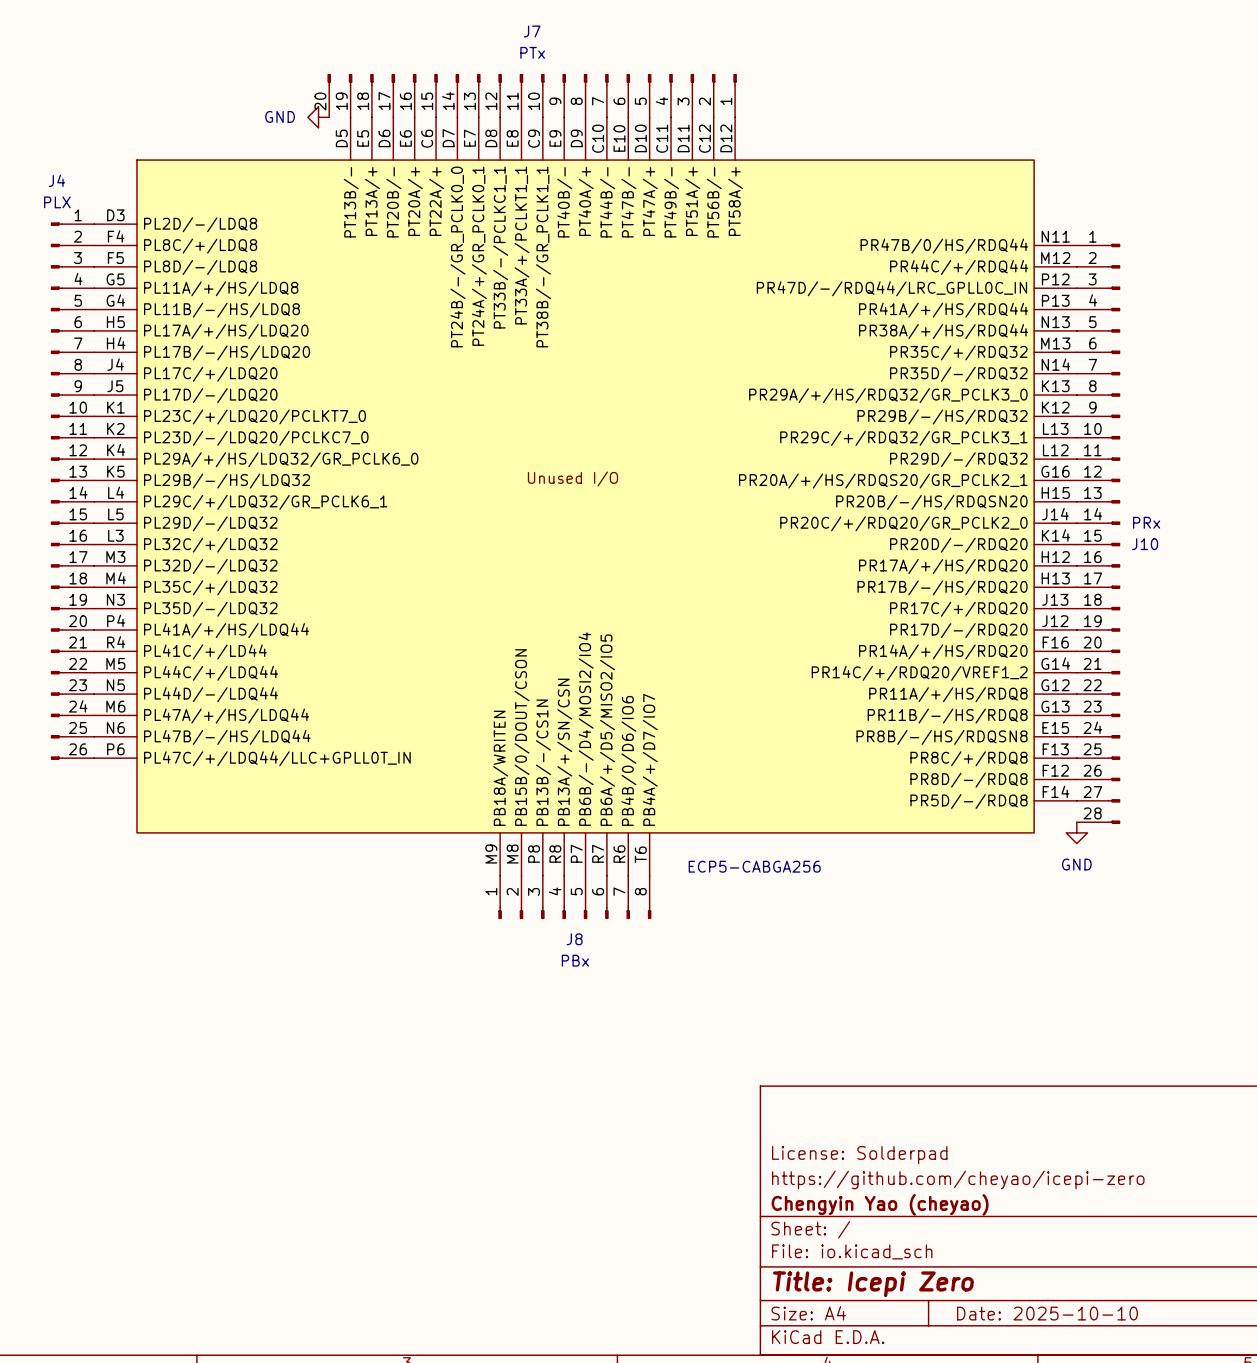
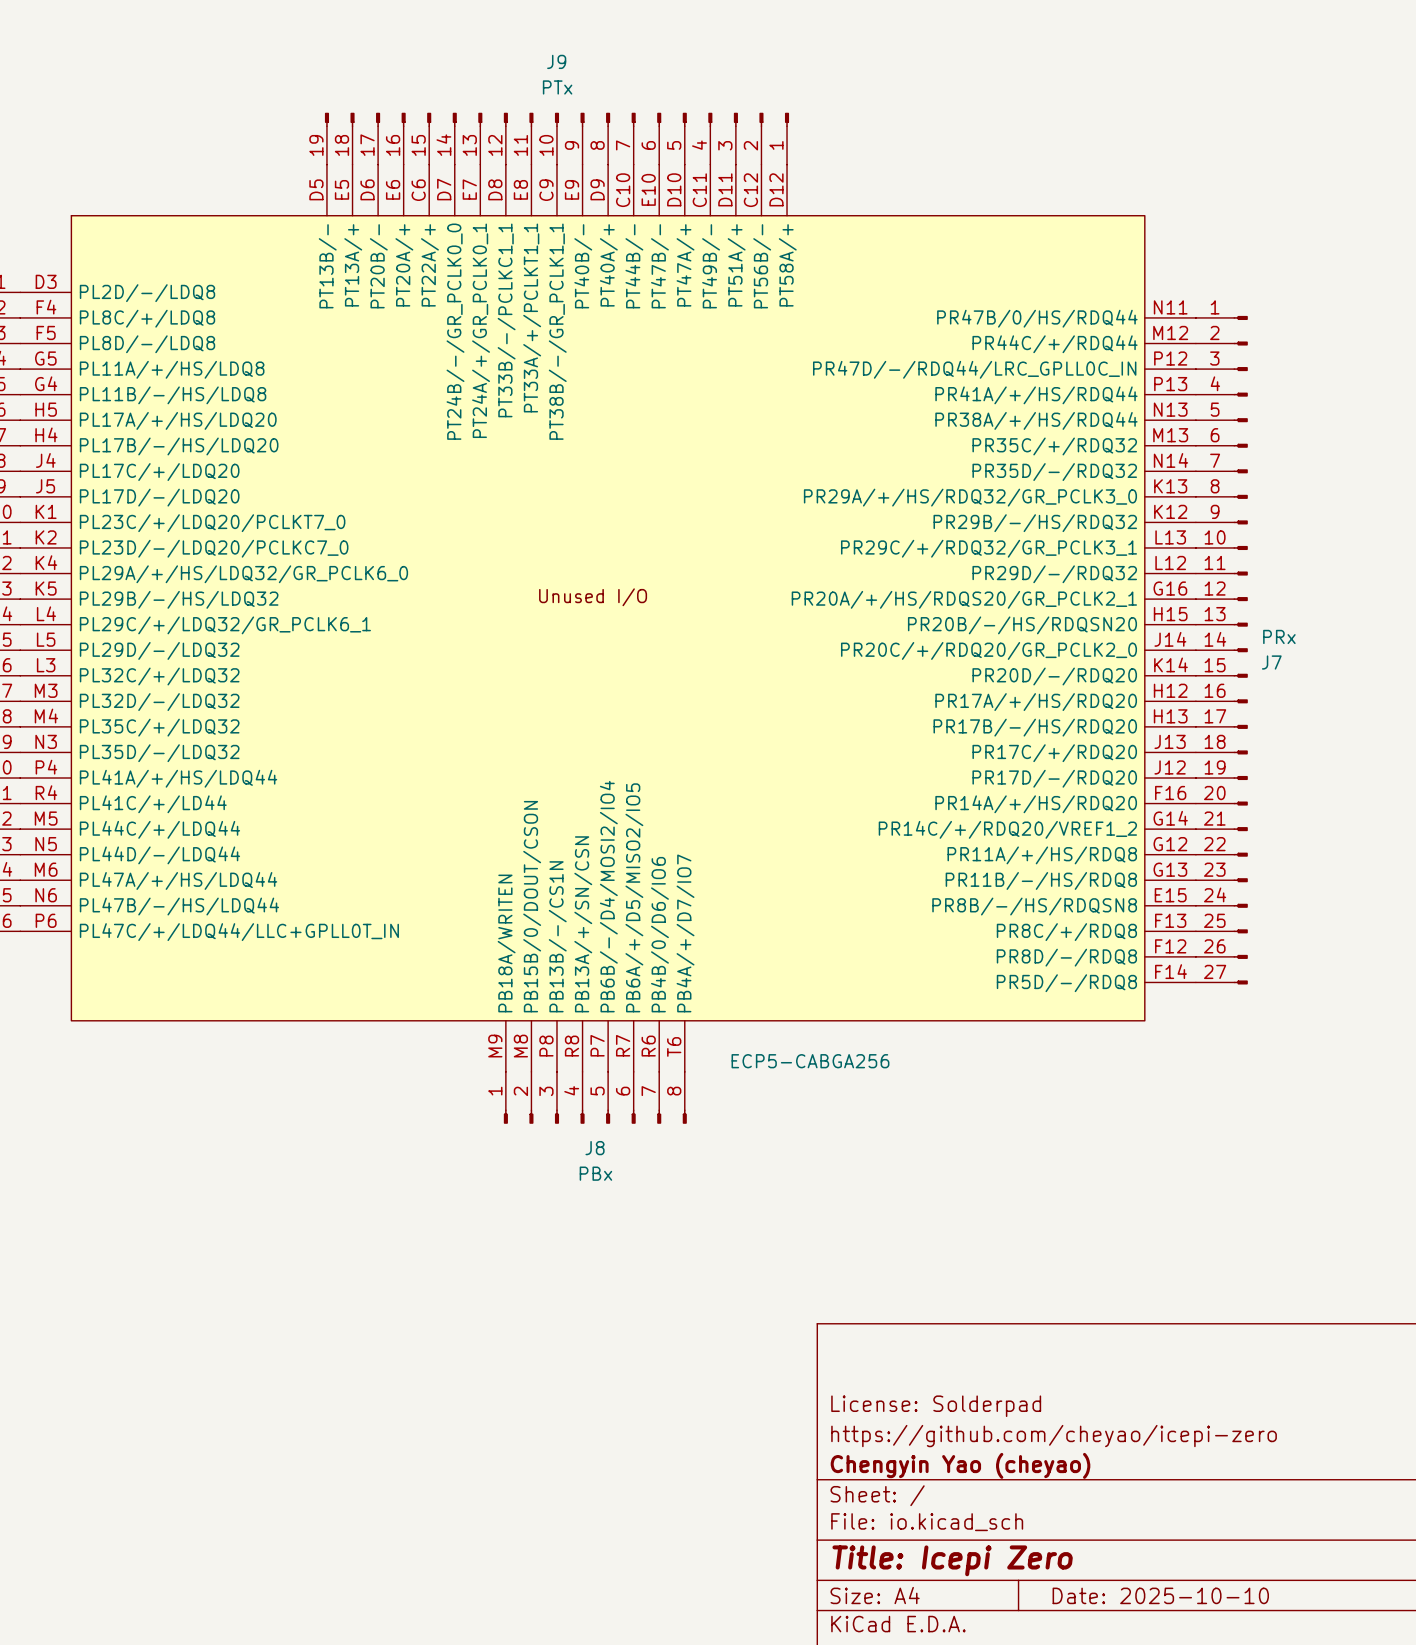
J7 name position: J7 (532, 31) -> J7 (1271, 662)
J7 value: PTx (532, 52) -> PRx (1279, 636)
J7 symbol: [327, 73, 737, 118] -> [1195, 315, 1248, 985]
J9: none -> PTx (556, 138)
power symbol: GND (318, 117) -> none
J10: PRx (1098, 533) -> none
power symbol: GND (1076, 832) -> none

